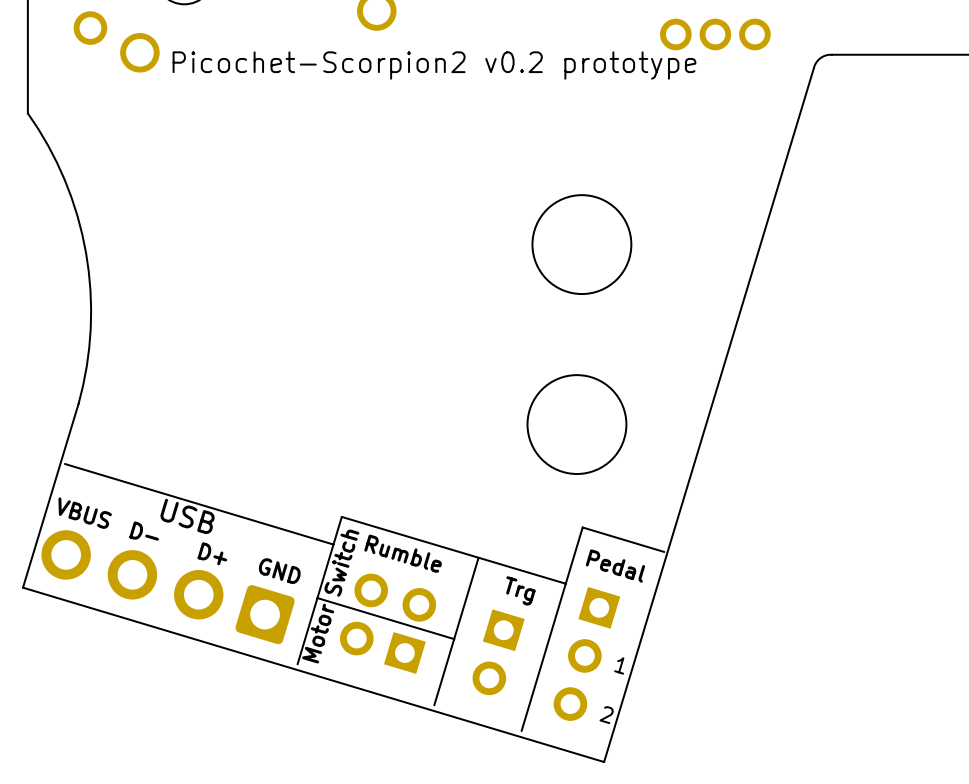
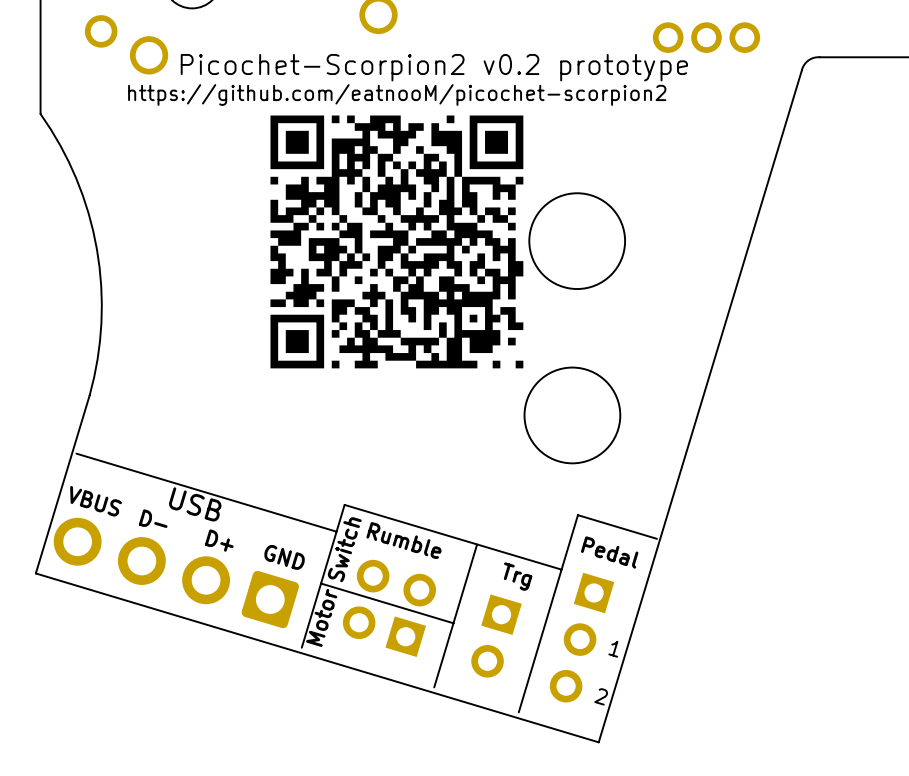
drawing: none -> [270, 115, 524, 369]

